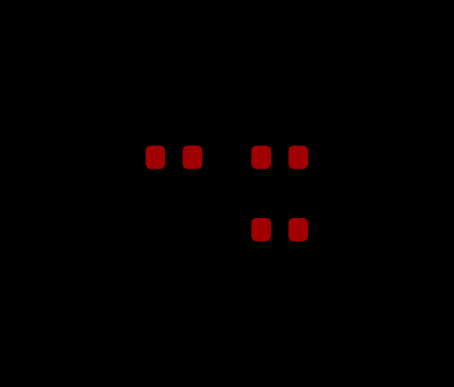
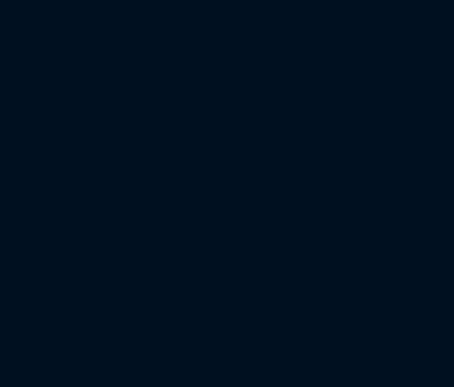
part: (173, 157) -> none
part: (279, 157) -> none
part: (279, 229) -> none

